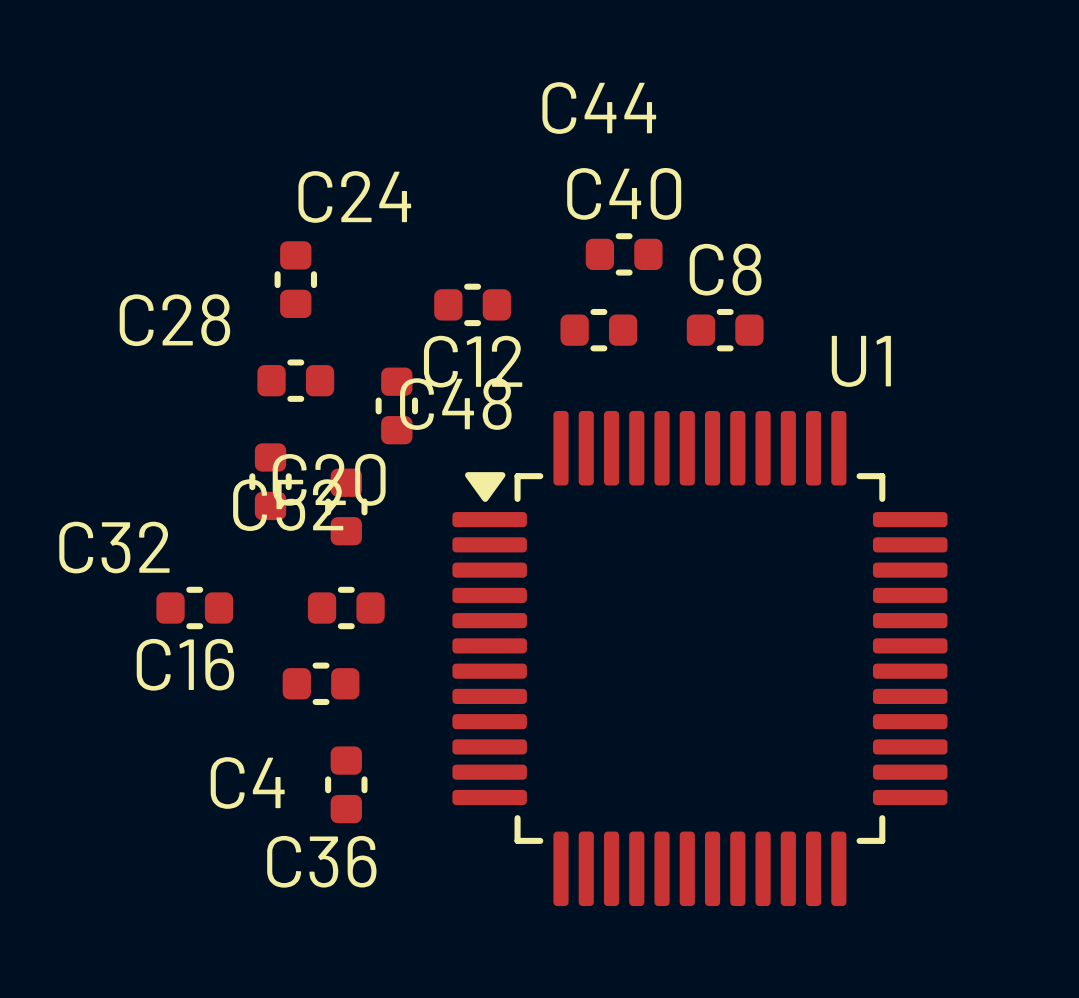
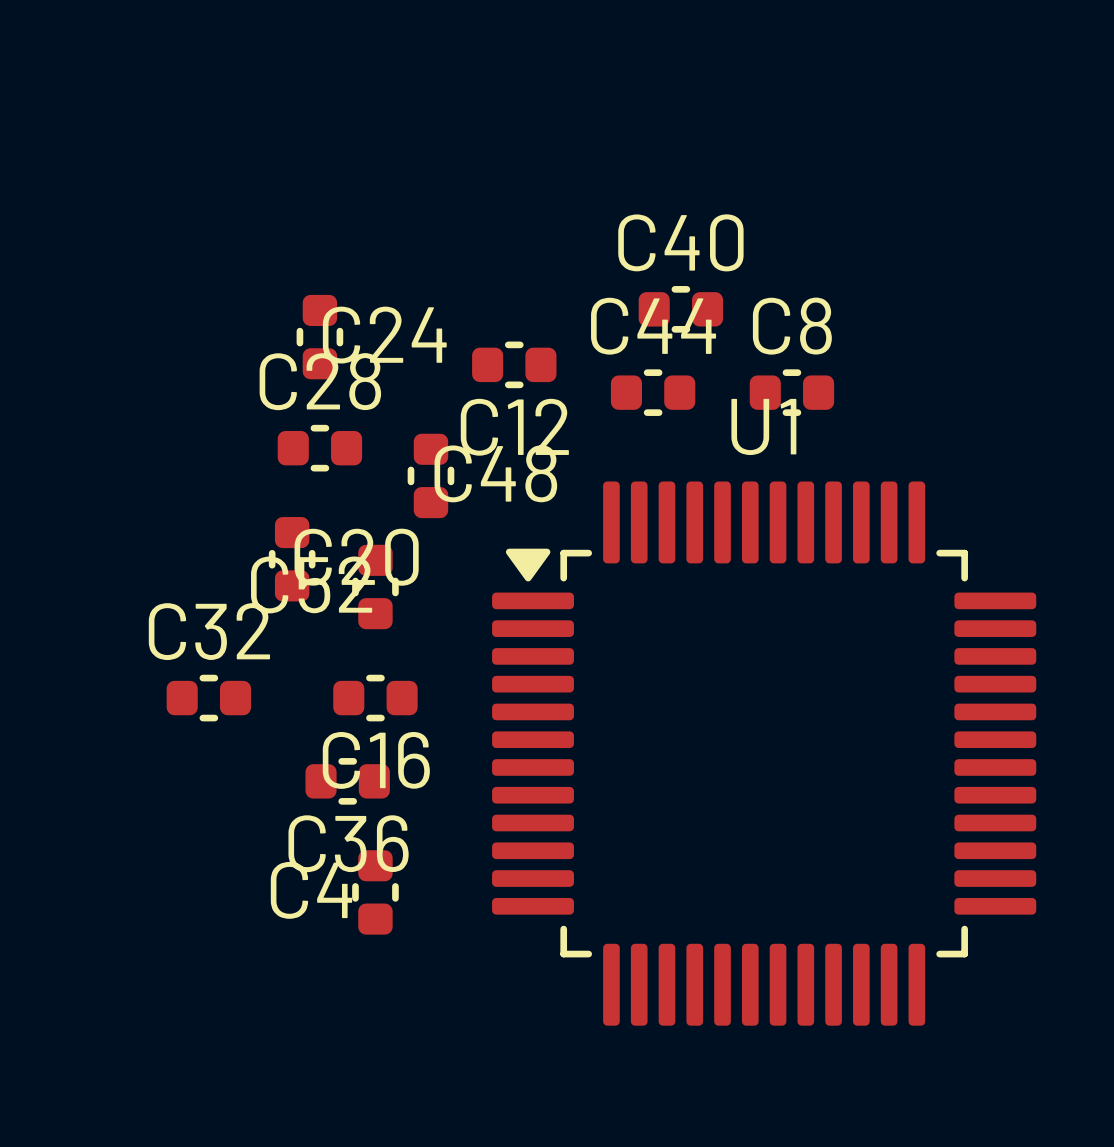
C44 name position: C44 (599, 108) -> C44 (653, 326)
C24 name position: C24 (354, 196) -> C24 (384, 335)
C28 name position: C28 (174, 320) -> C28 (320, 381)
U1 name position: U1 (861, 361) -> U1 (763, 426)
C32 name position: C32 (114, 547) -> C32 (209, 631)
C16 name position: C16 (185, 664) -> C16 (376, 760)
C4 name position: C4 (247, 782) -> C4 (311, 890)
C36 name position: C36 (321, 861) -> C36 (348, 843)

